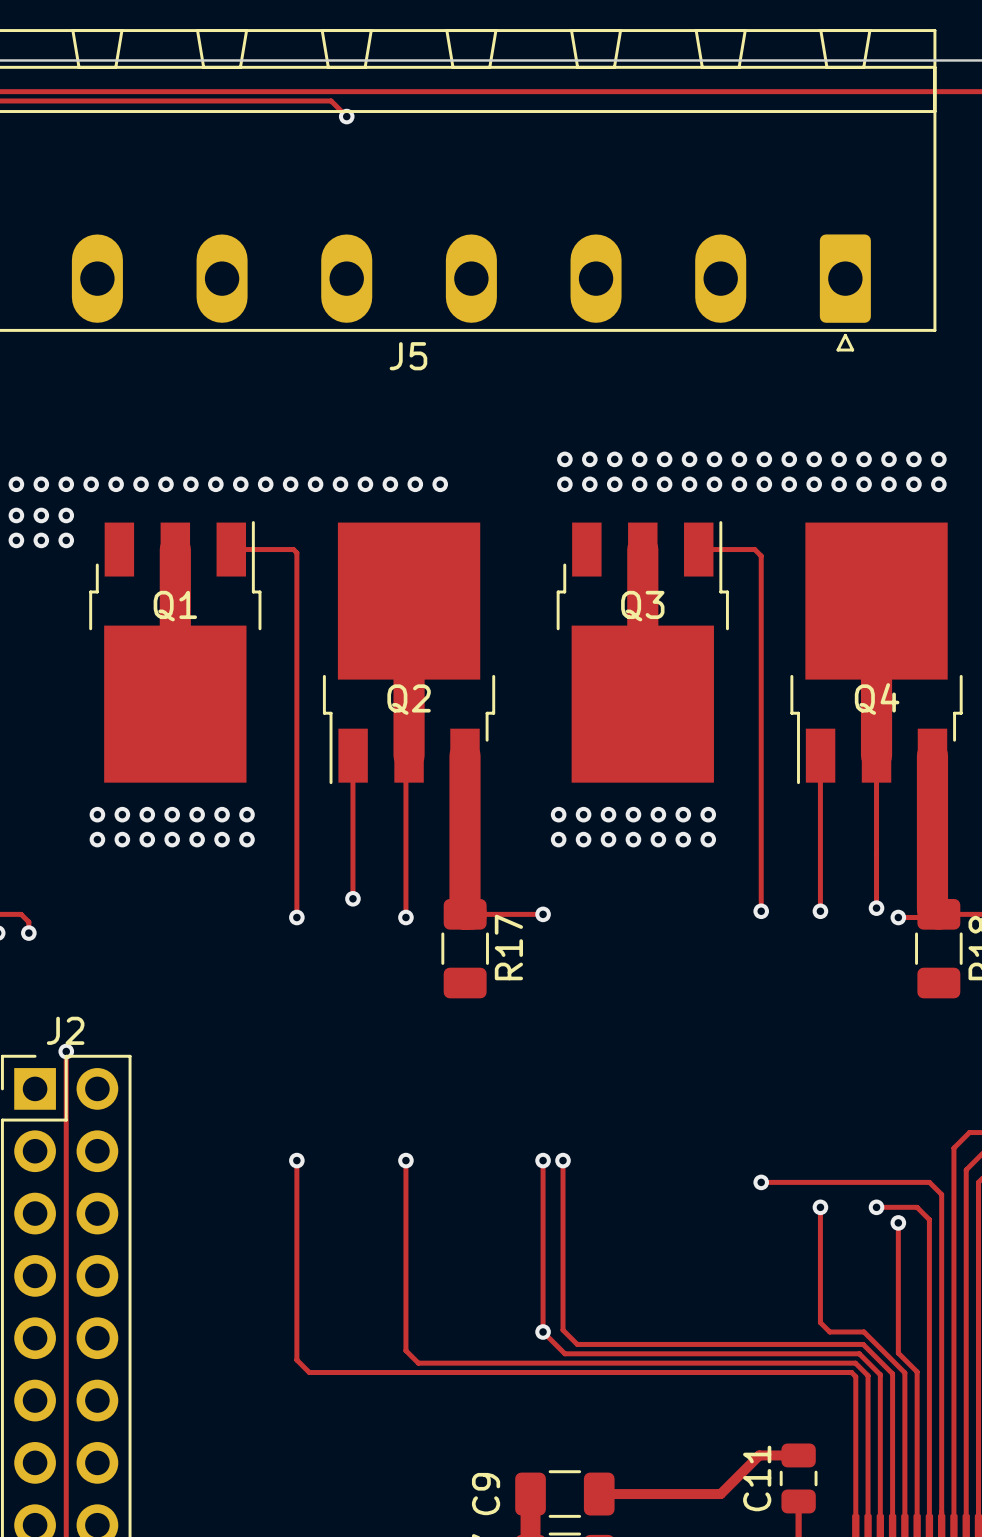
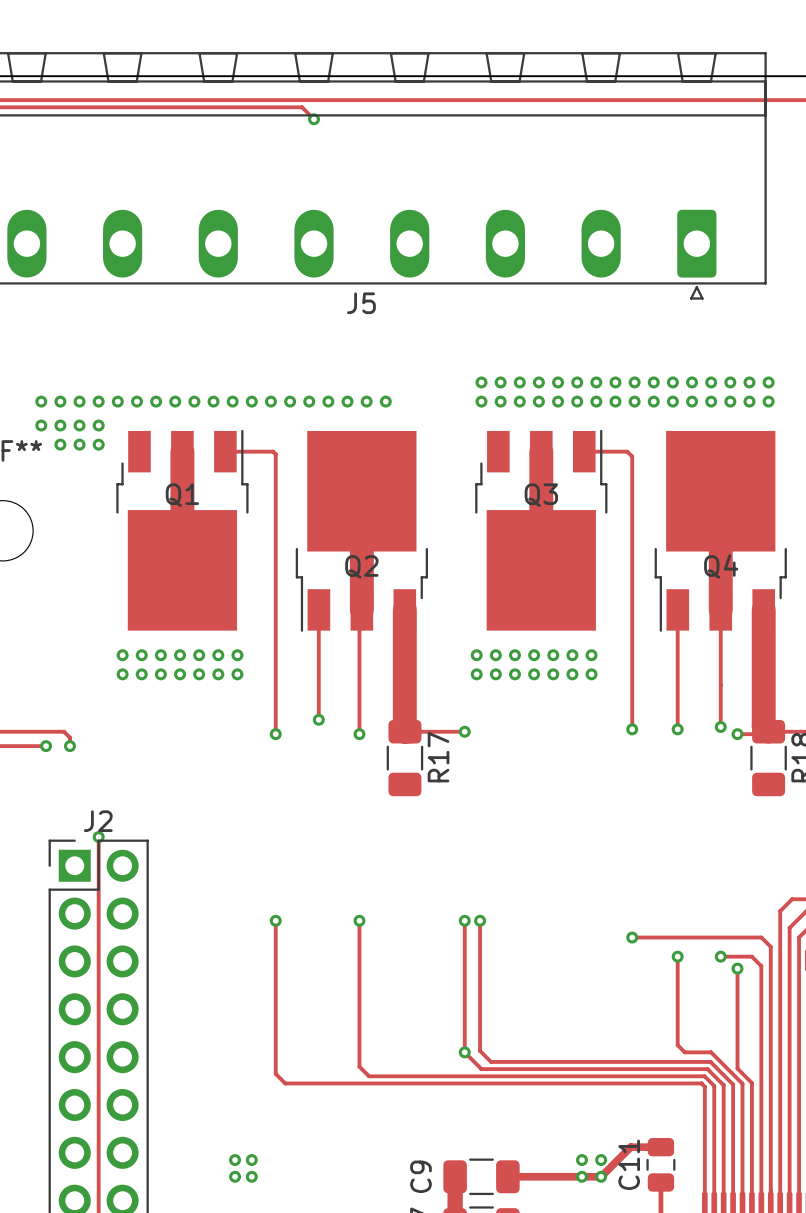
via: none -> (235, 1160)
via: none -> (251, 1160)
via: none -> (581, 1160)
via: none -> (601, 1160)
via: none -> (235, 1176)
via: none -> (251, 1176)
via: none -> (581, 1176)
via: none -> (601, 1176)

